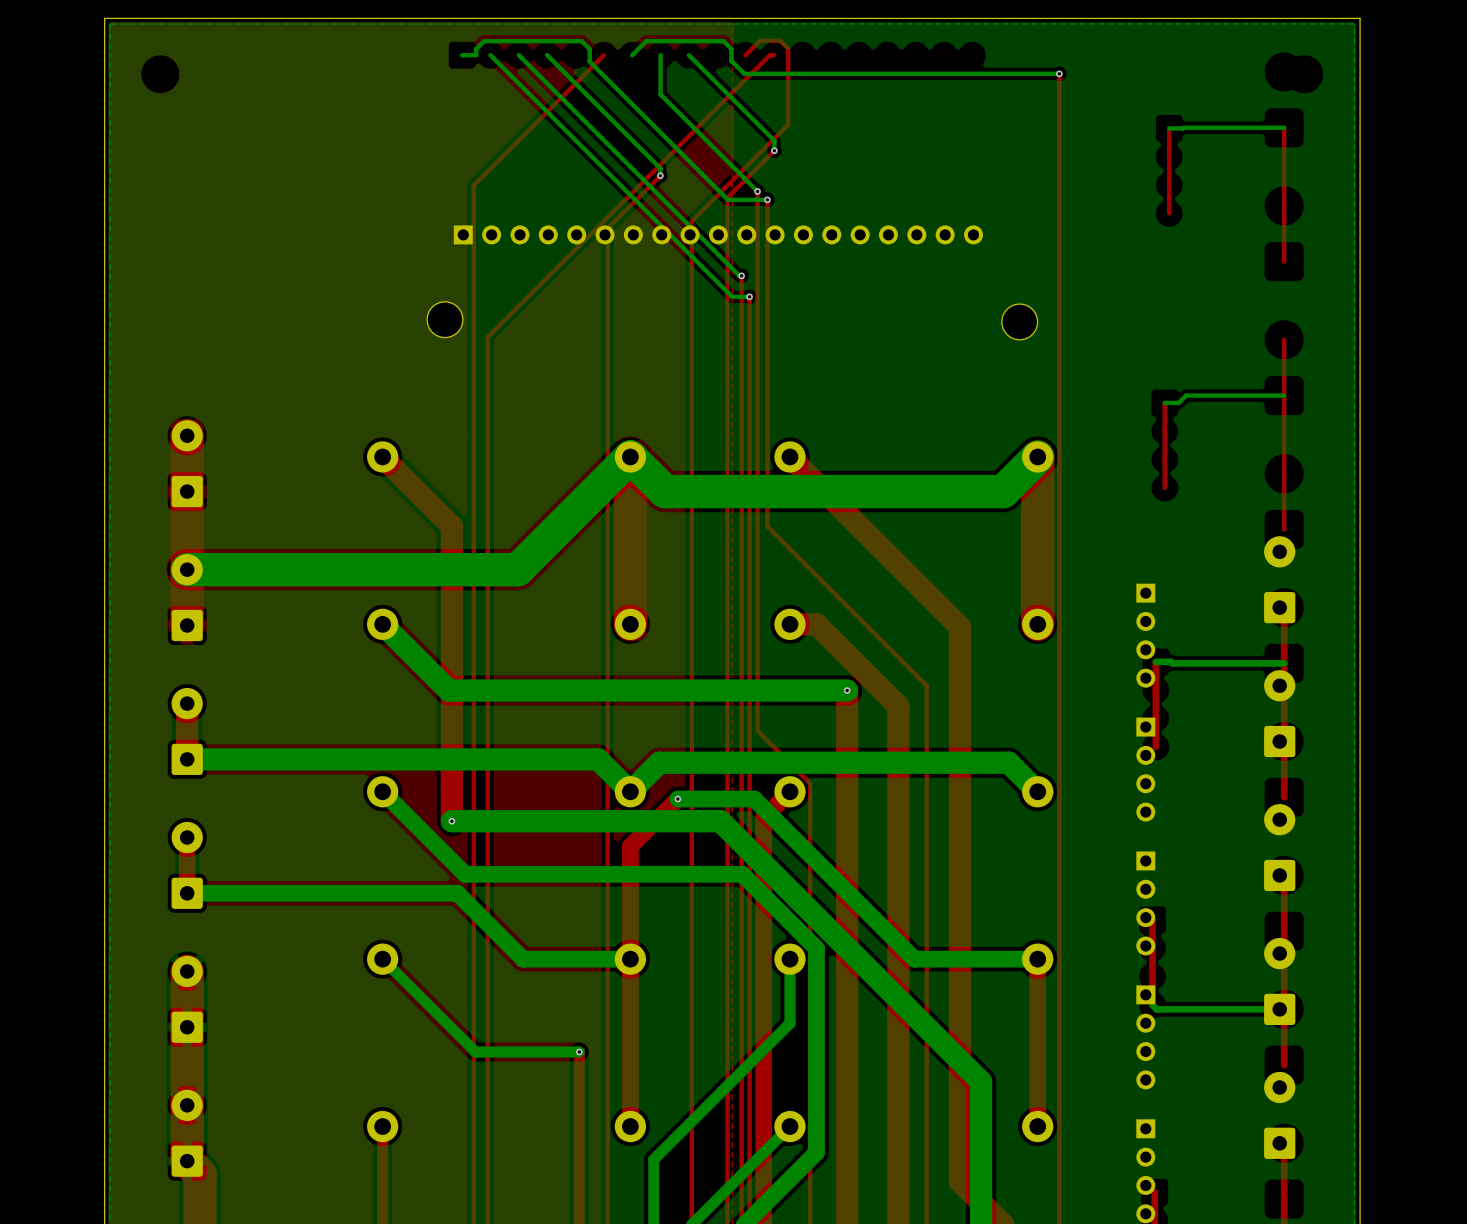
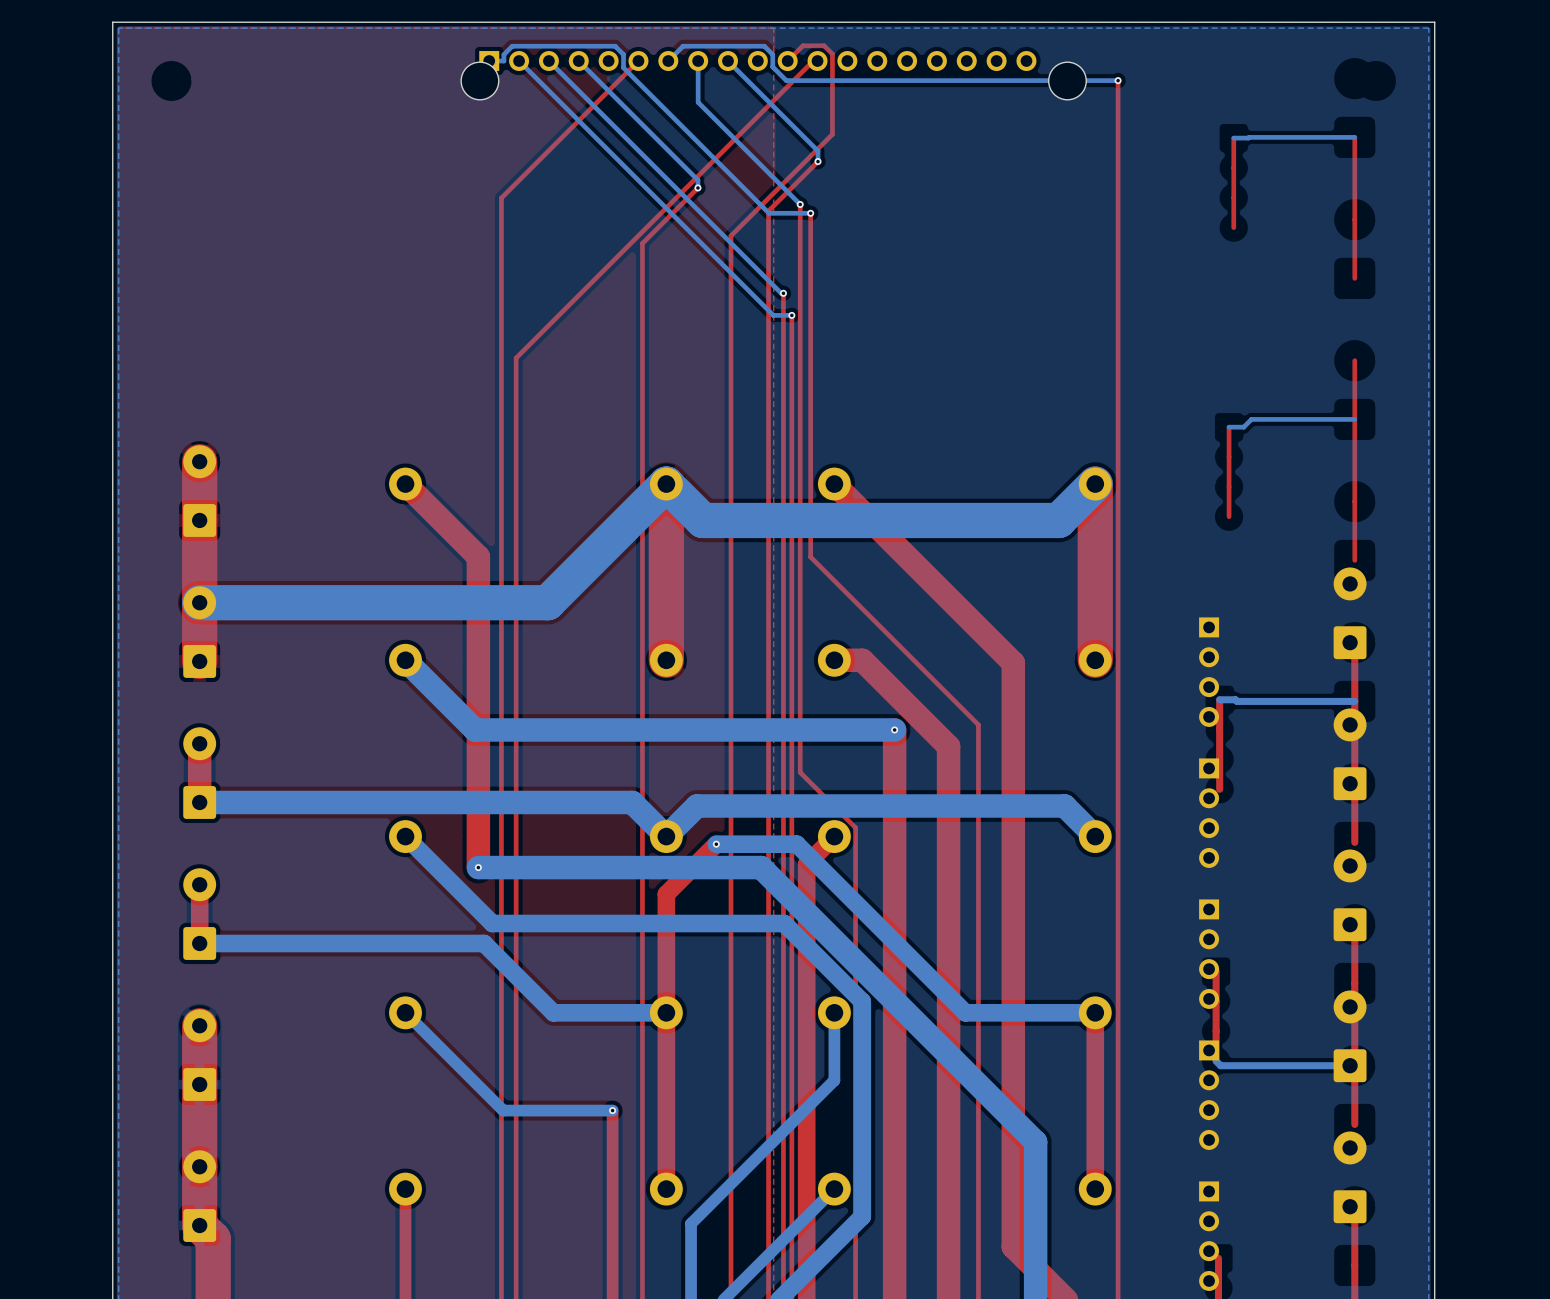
part position: (718, 234) -> (757, 61)
part position: (444, 319) -> (479, 80)
part position: (1019, 321) -> (1067, 80)

